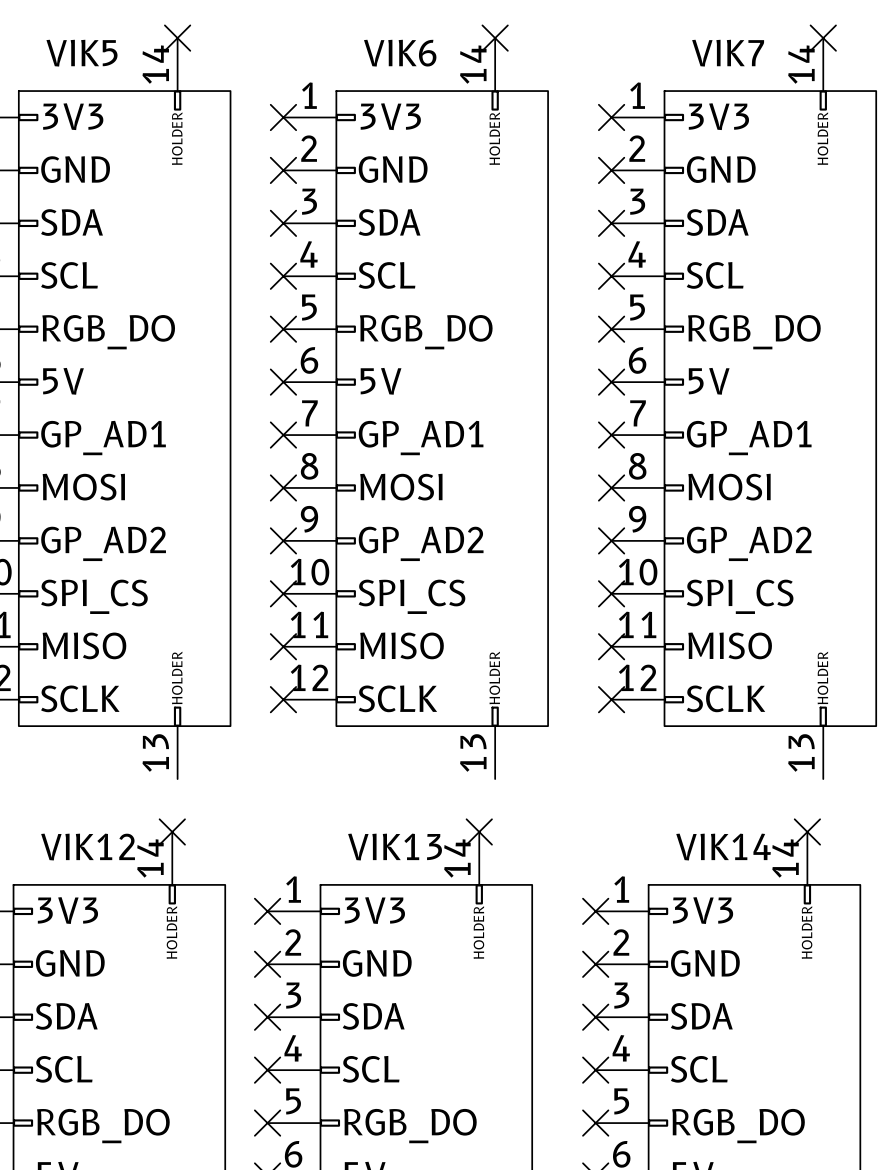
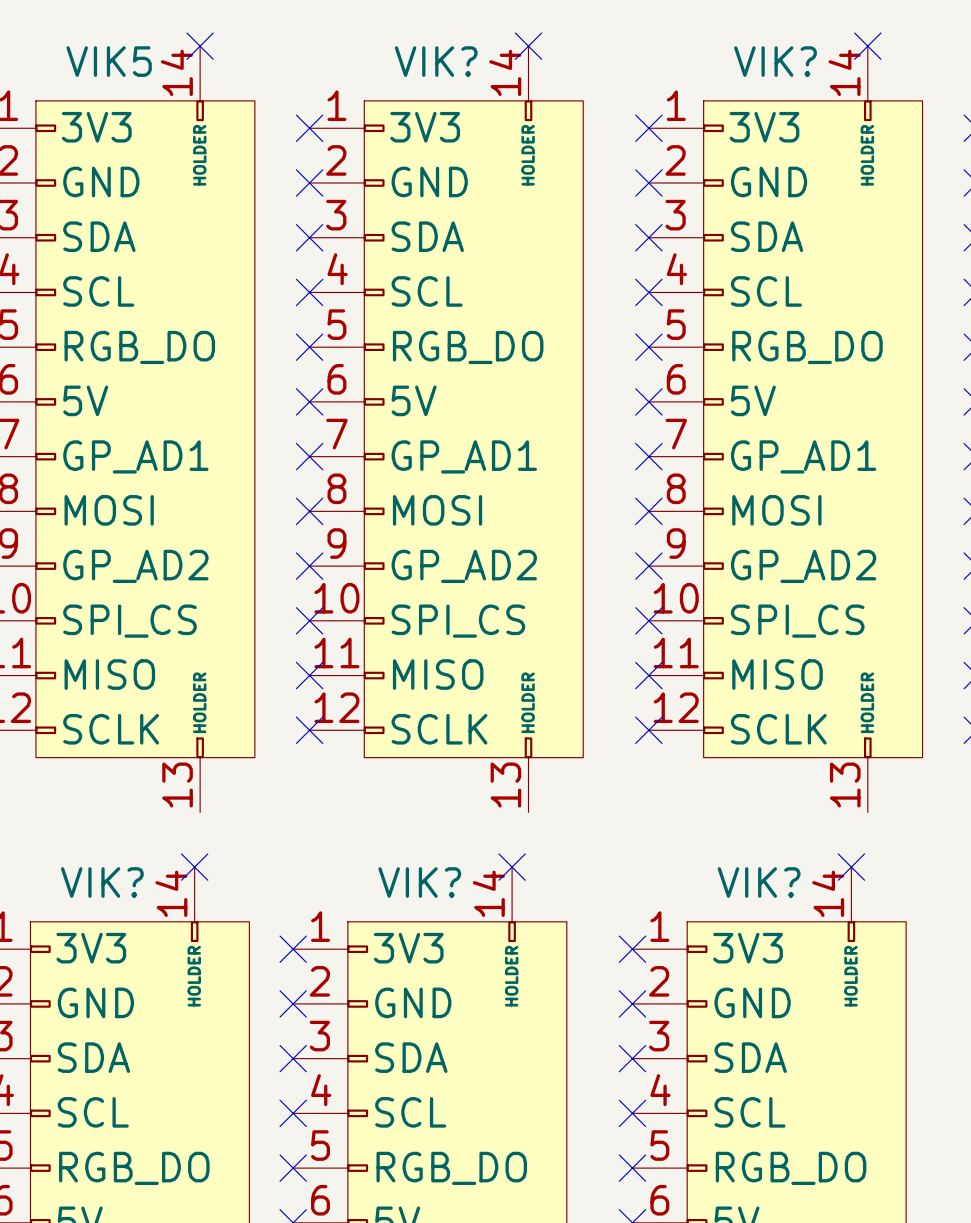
VIK6 name: VIK6 (400, 53) -> VIK? (436, 61)
VIK7 name: VIK7 (728, 53) -> VIK? (775, 61)
VIK12 name: VIK12 (88, 847) -> VIK? (102, 882)
VIK13 name: VIK13 (395, 847) -> VIK? (419, 882)
VIK14 name: VIK14 (723, 847) -> VIK? (759, 882)

